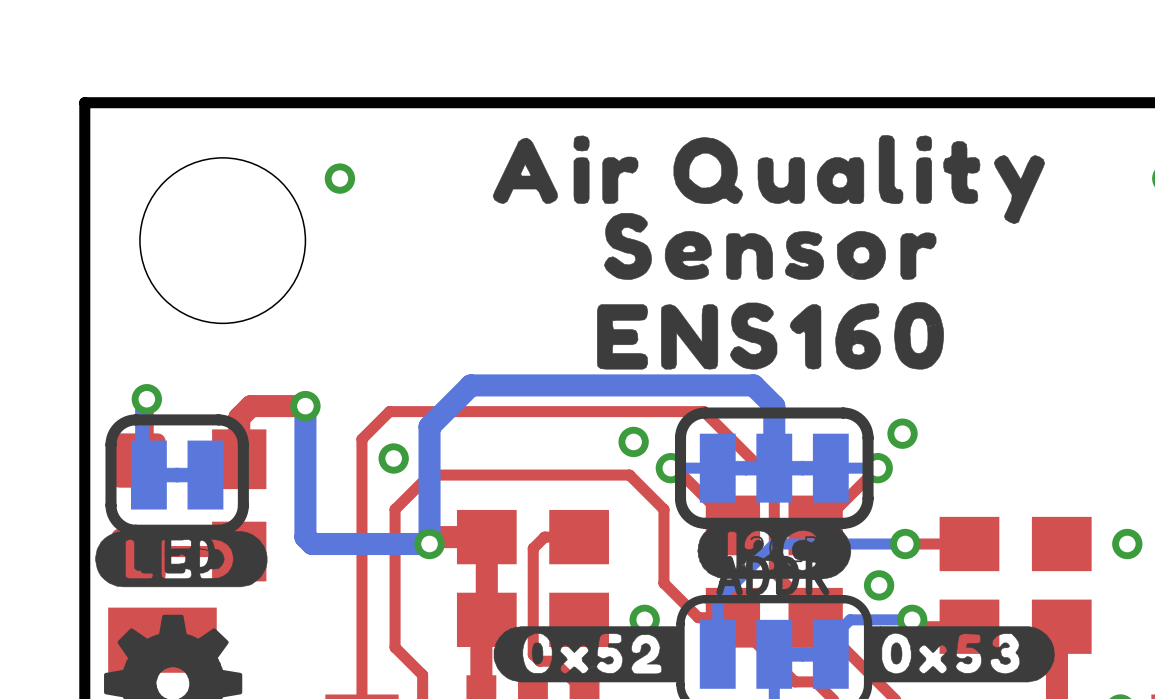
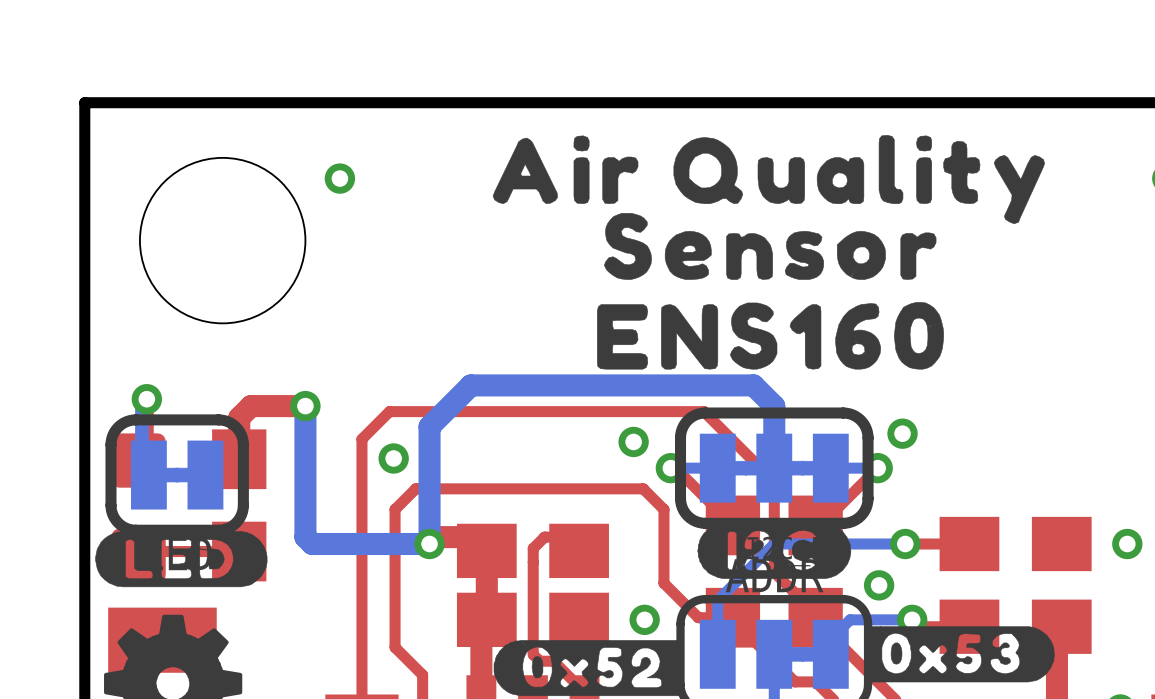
top track: (643, 488) (629, 475) (429, 475) (415, 488) -> (643, 488) (415, 488)
part position: (532, 537) -> (532, 550)
drawing position: (588, 654) -> (588, 668)

